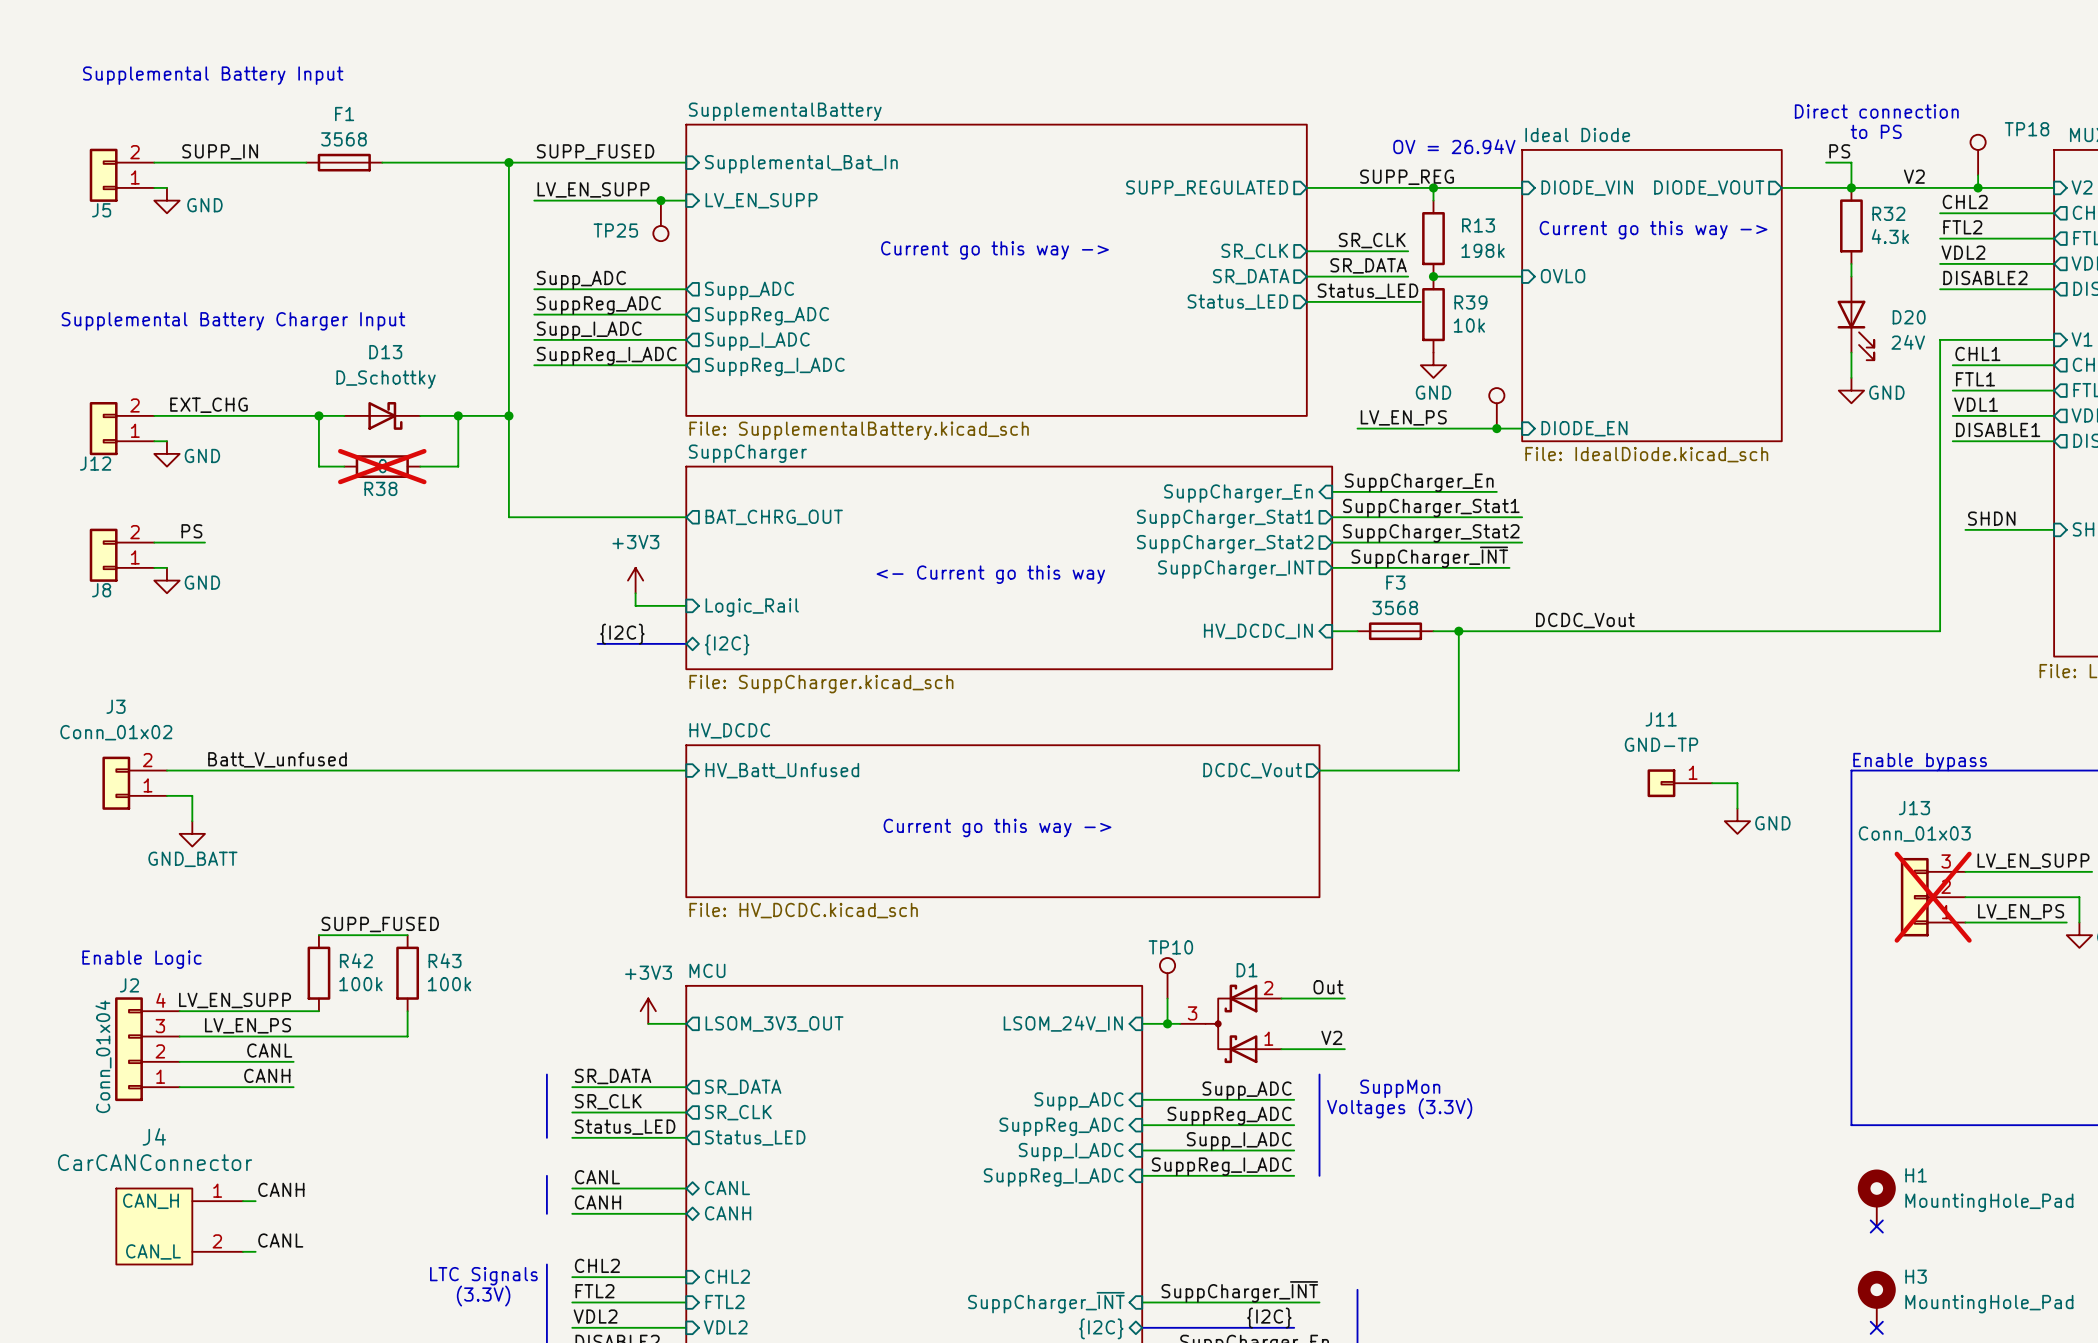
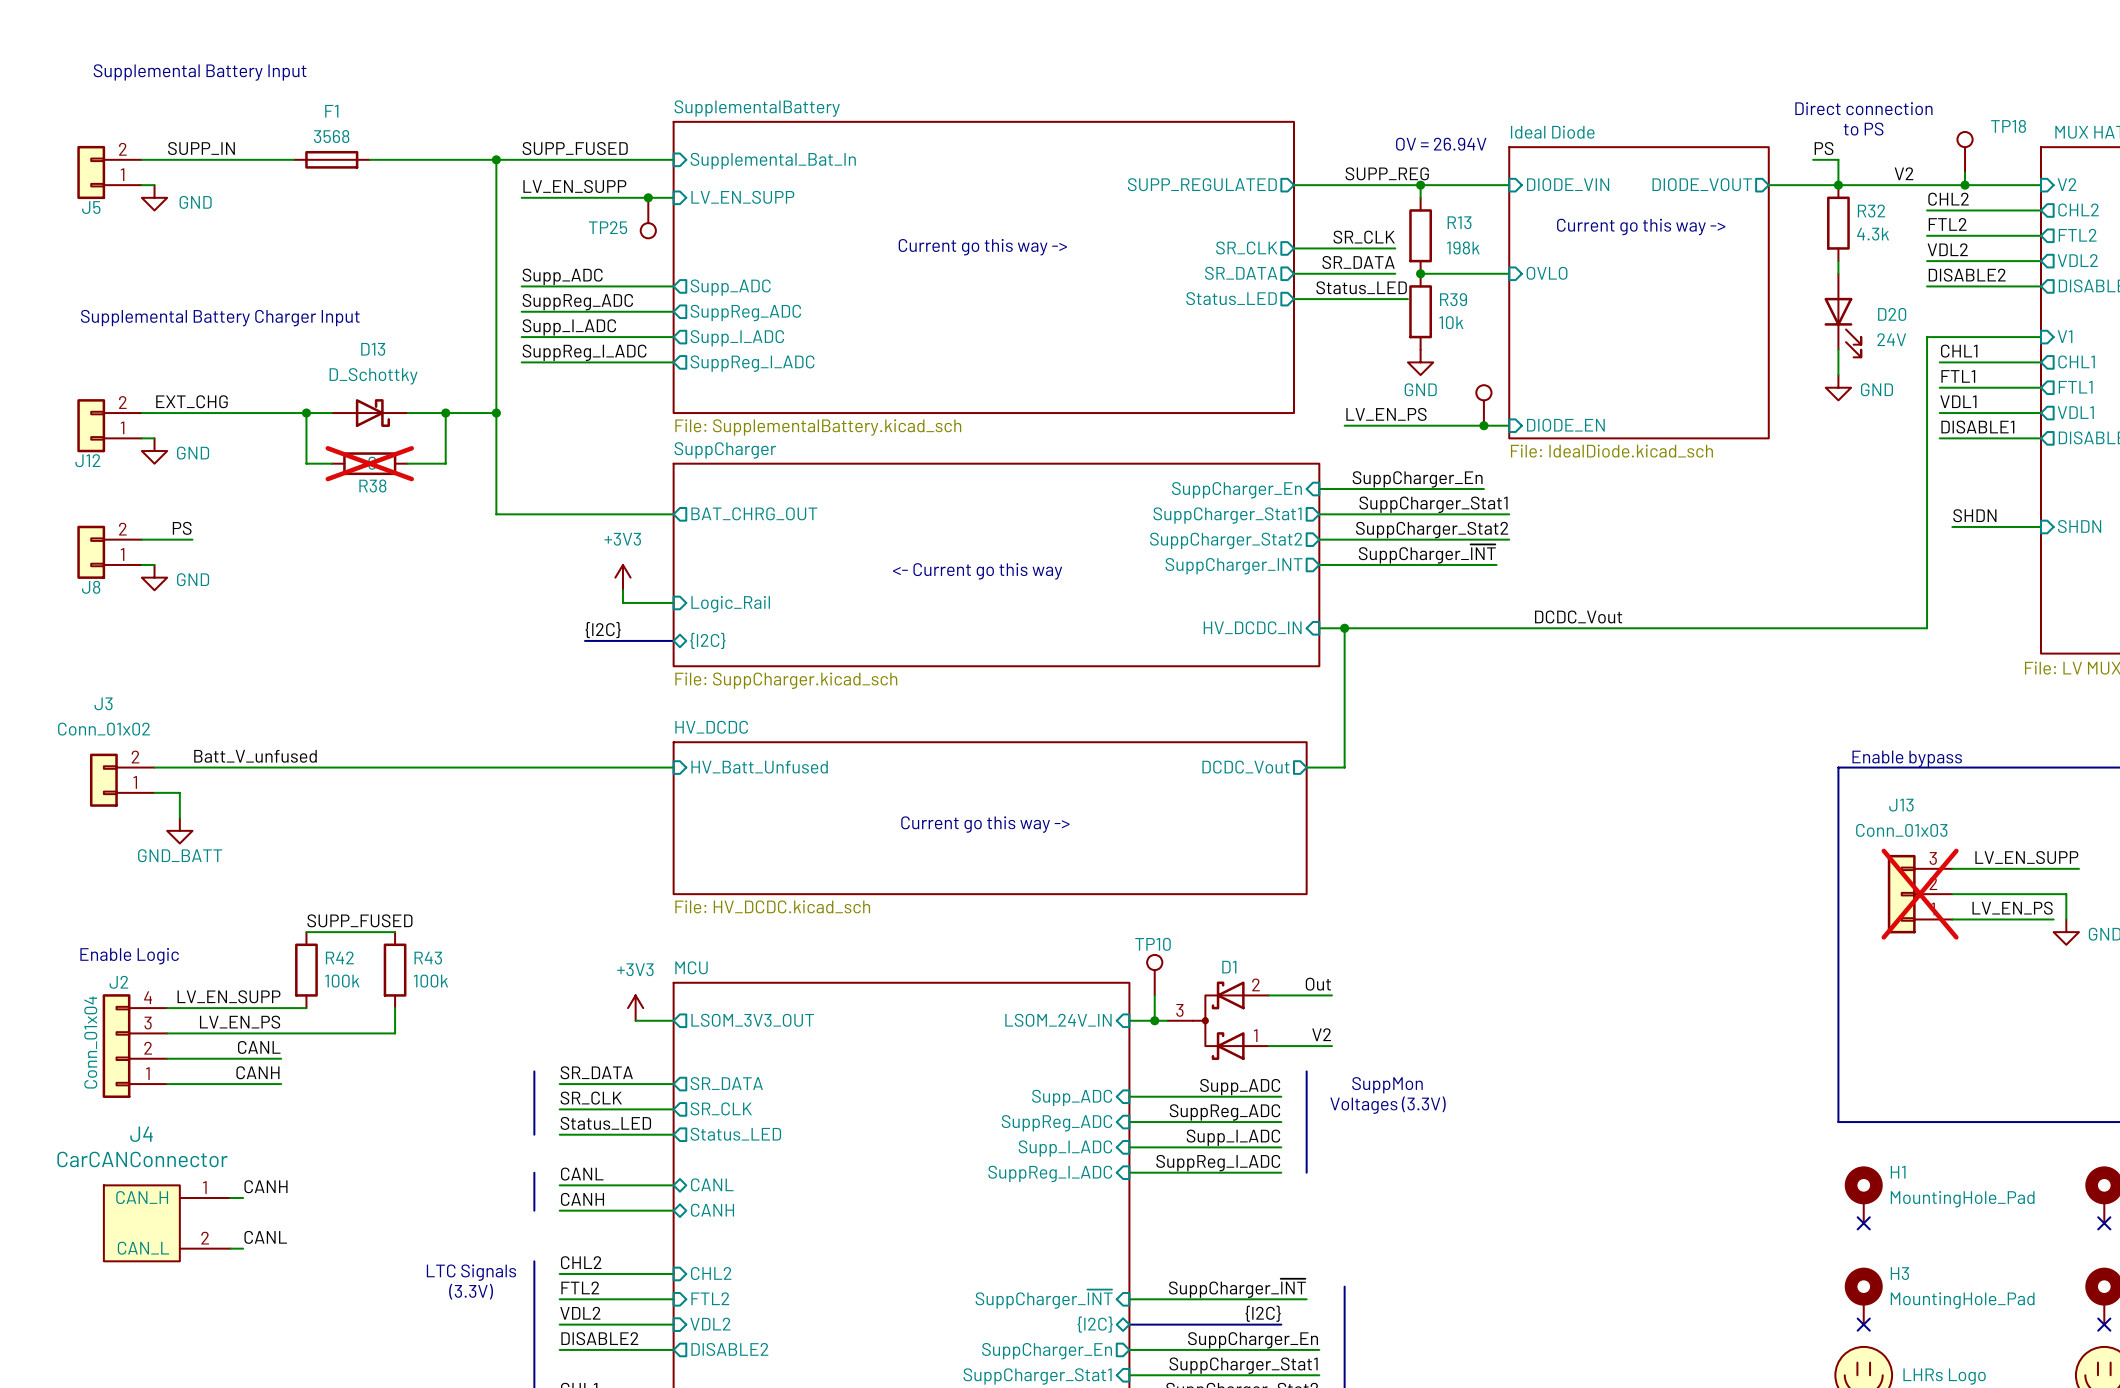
junction: none -> (1344, 628)
F3: 3568 (1395, 631) -> none
wire: (1458, 631) (1458, 770) (1357, 770) -> (1420, 628) (1344, 628) (1344, 767)
junction: (1458, 631) -> none
J11: GND-TP (1679, 783) -> none
wire: (1712, 783) (1737, 783) (1737, 808) -> none
power symbol: GND (1737, 821) -> none

